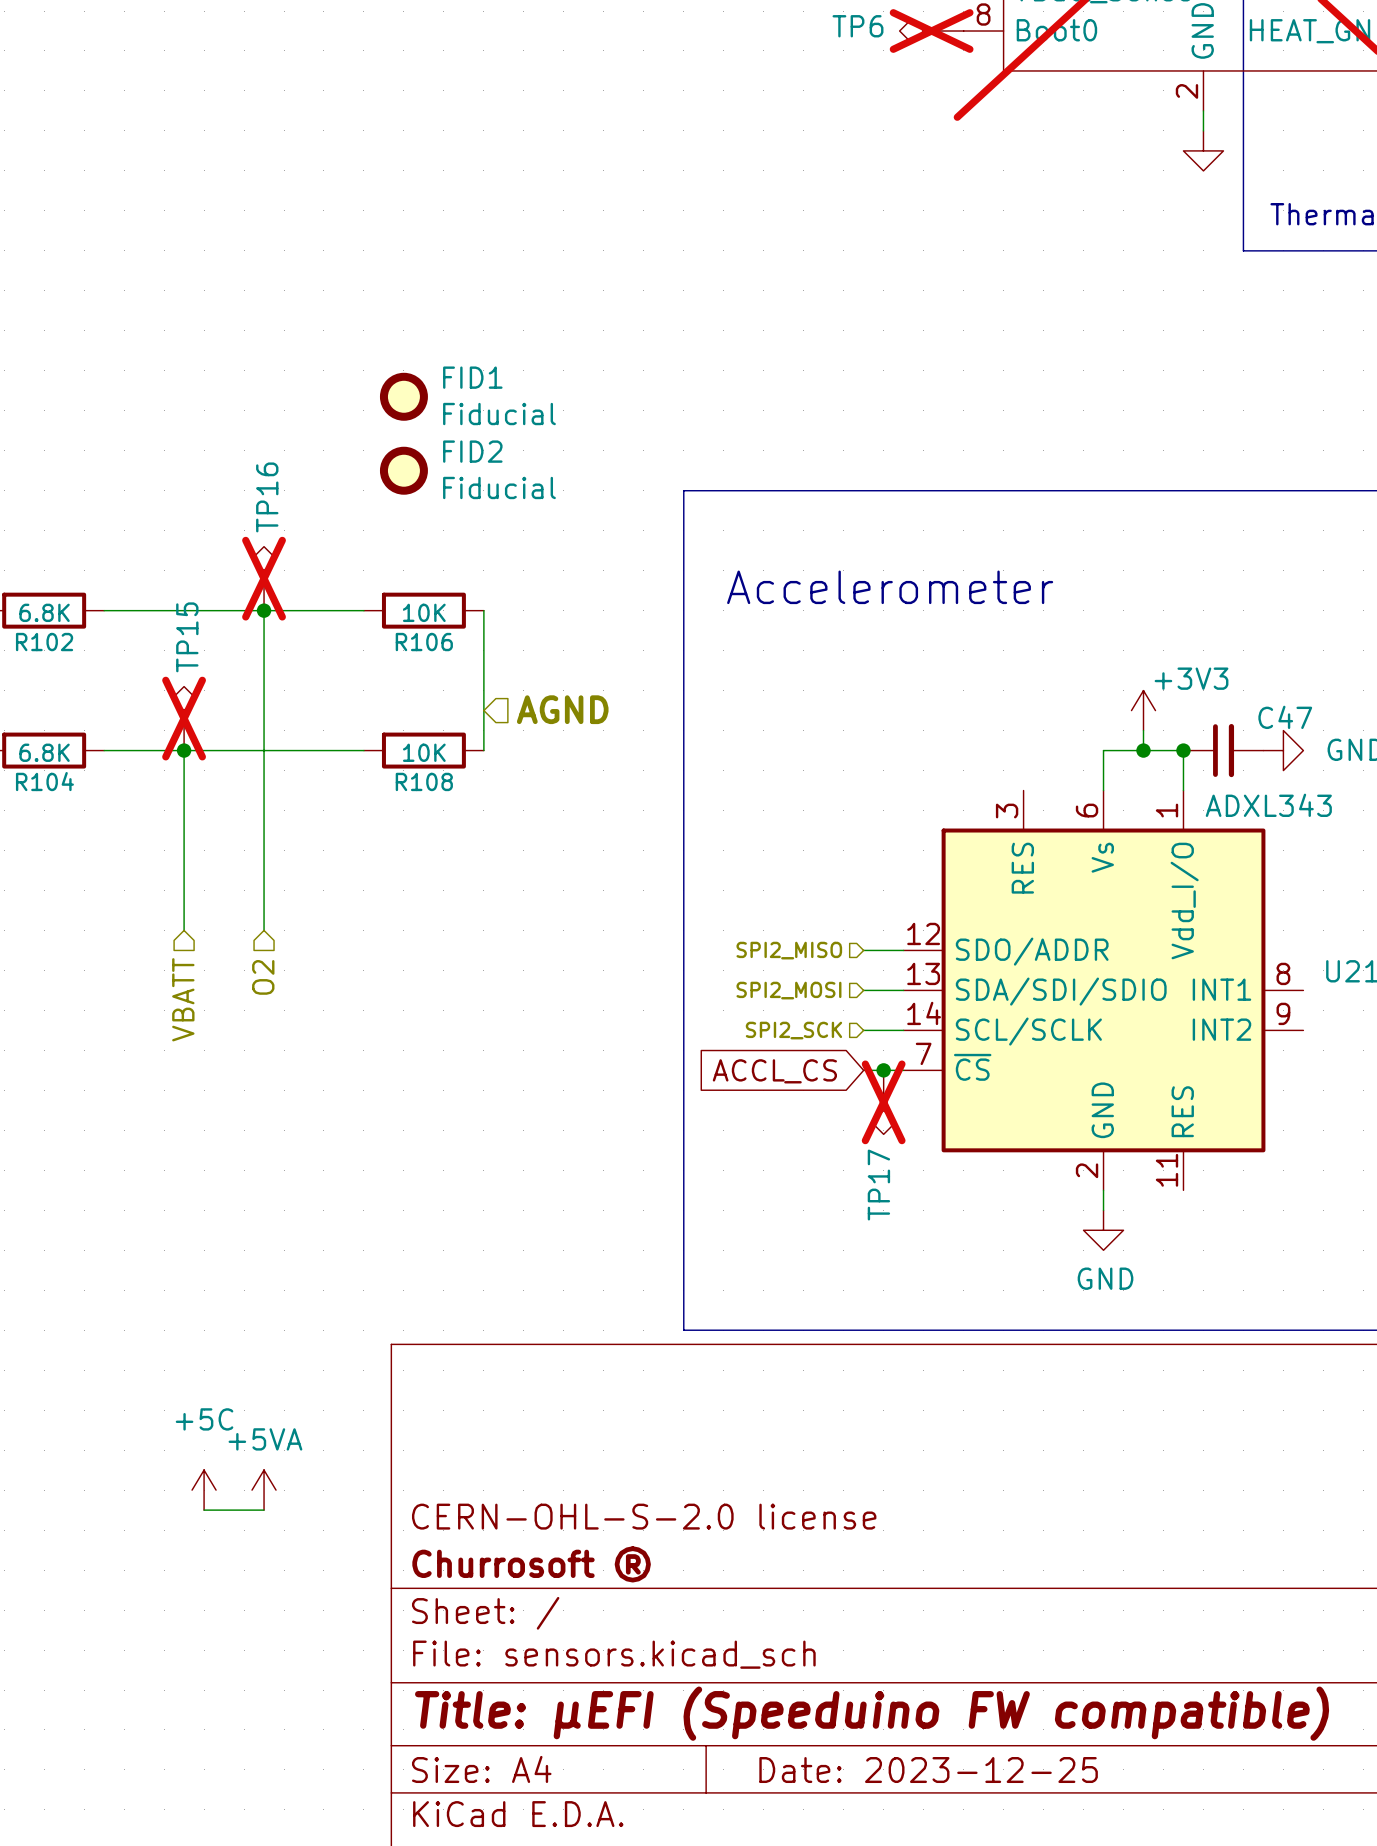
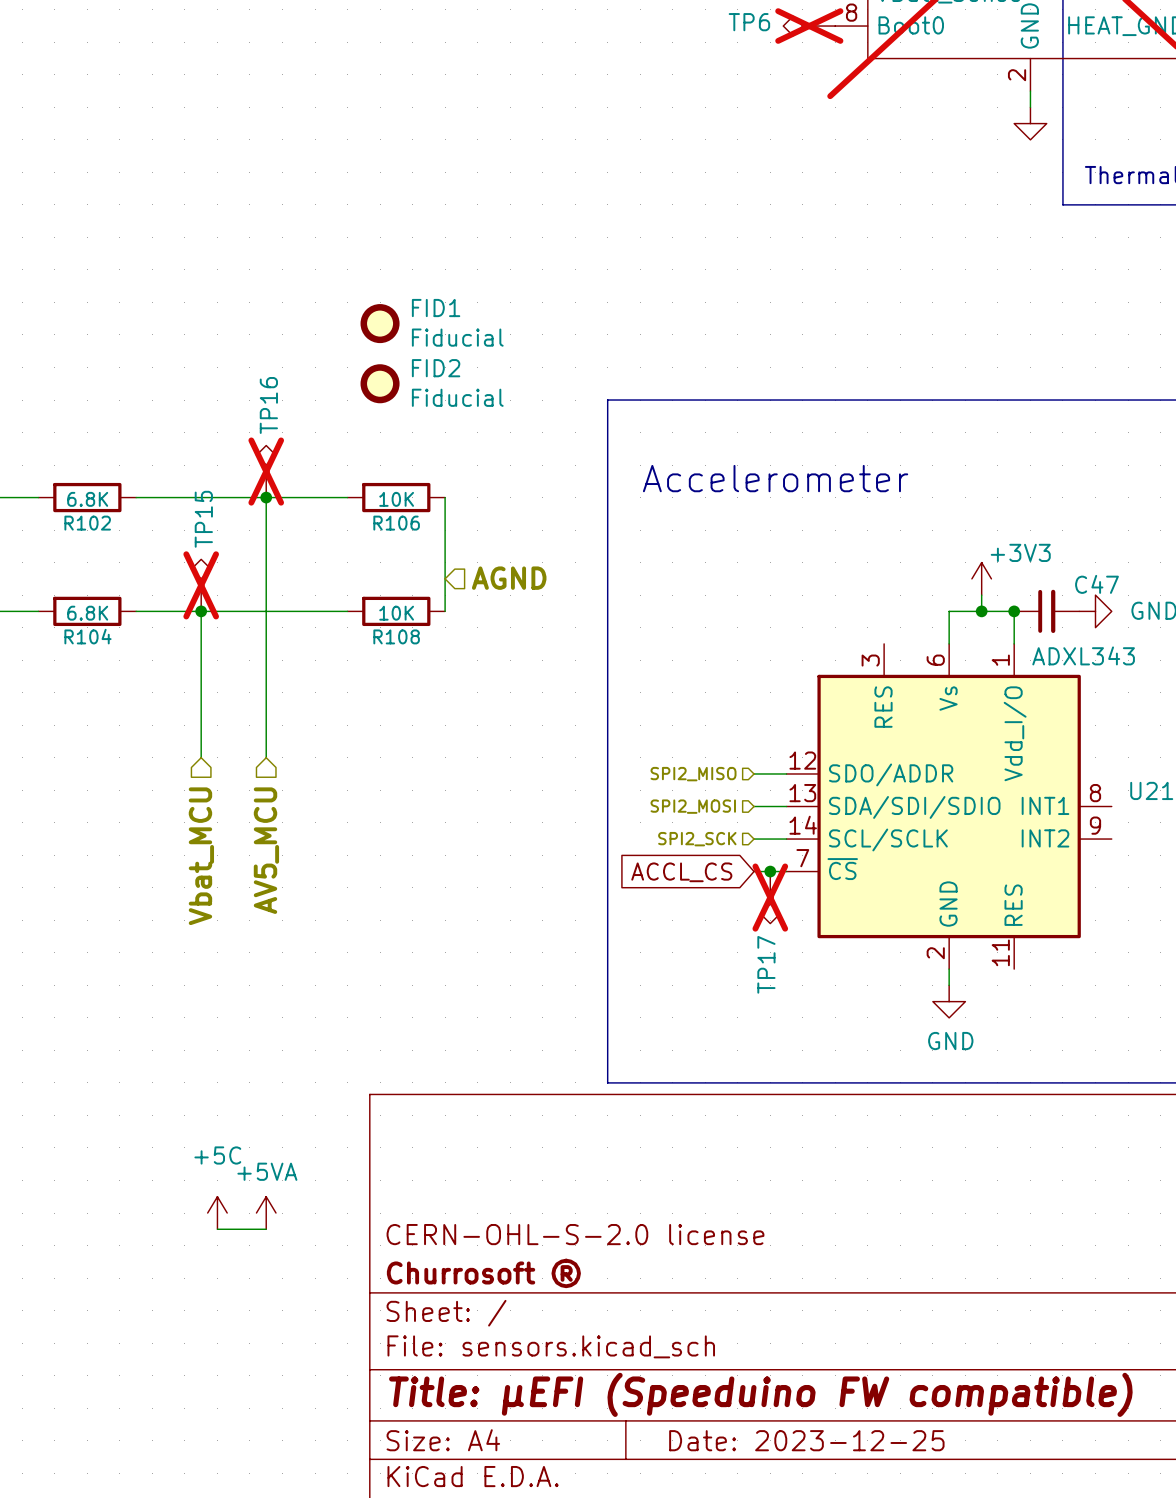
hierarchical label: O2 (263, 977) -> AV5_MCU (266, 850)
hierarchical label: VBATT (183, 999) -> Vbat_MCU (201, 856)

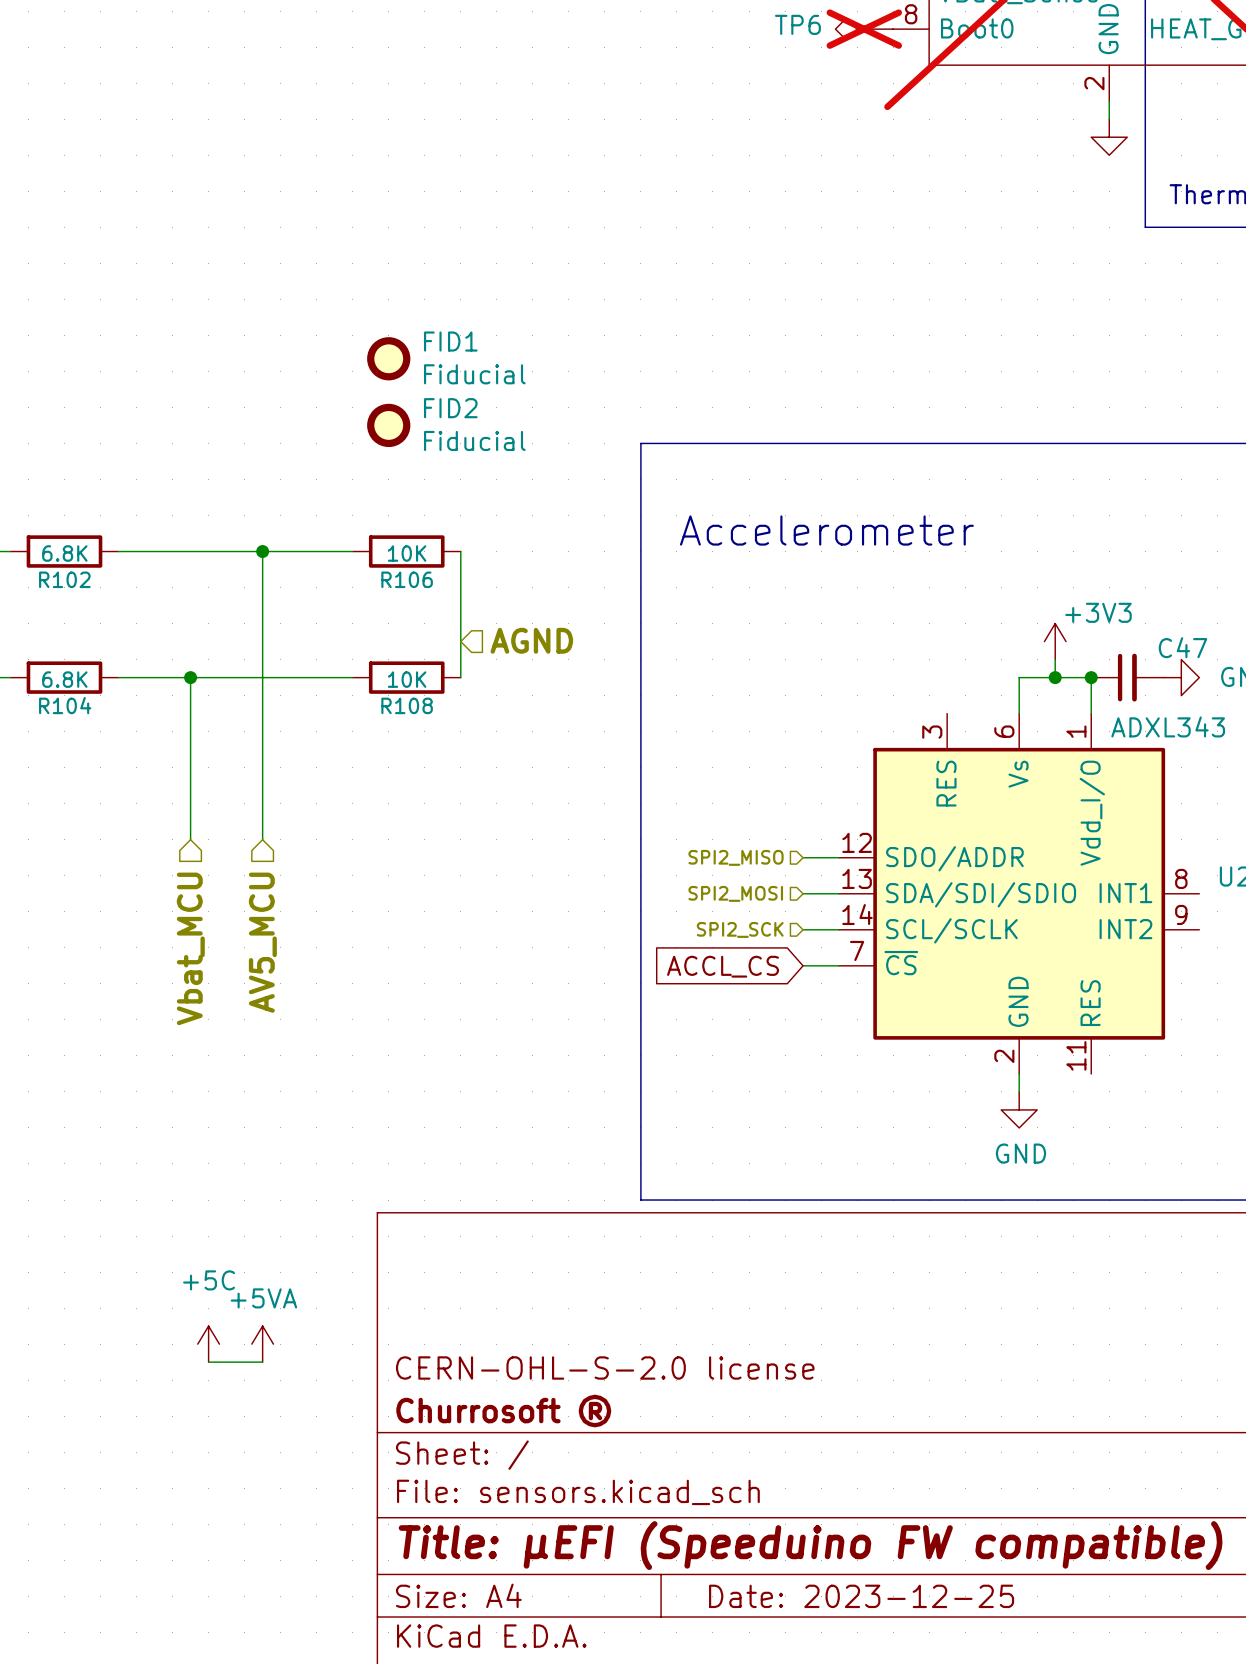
TP16: (266, 471) -> none
TP15: (201, 585) -> none
junction: (770, 871) -> none
TP17: (770, 897) -> none

